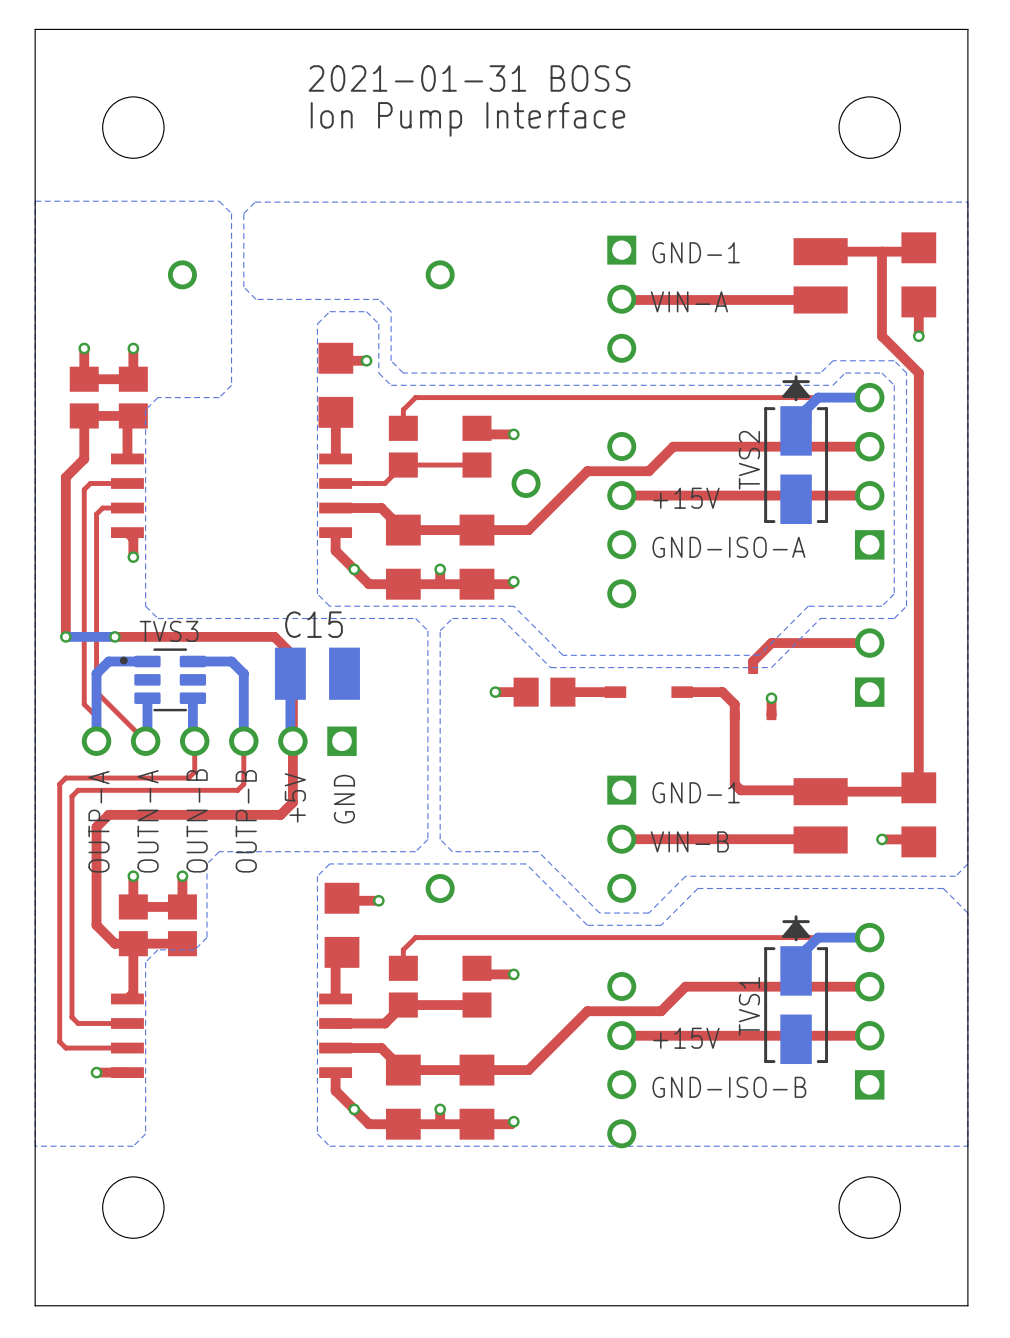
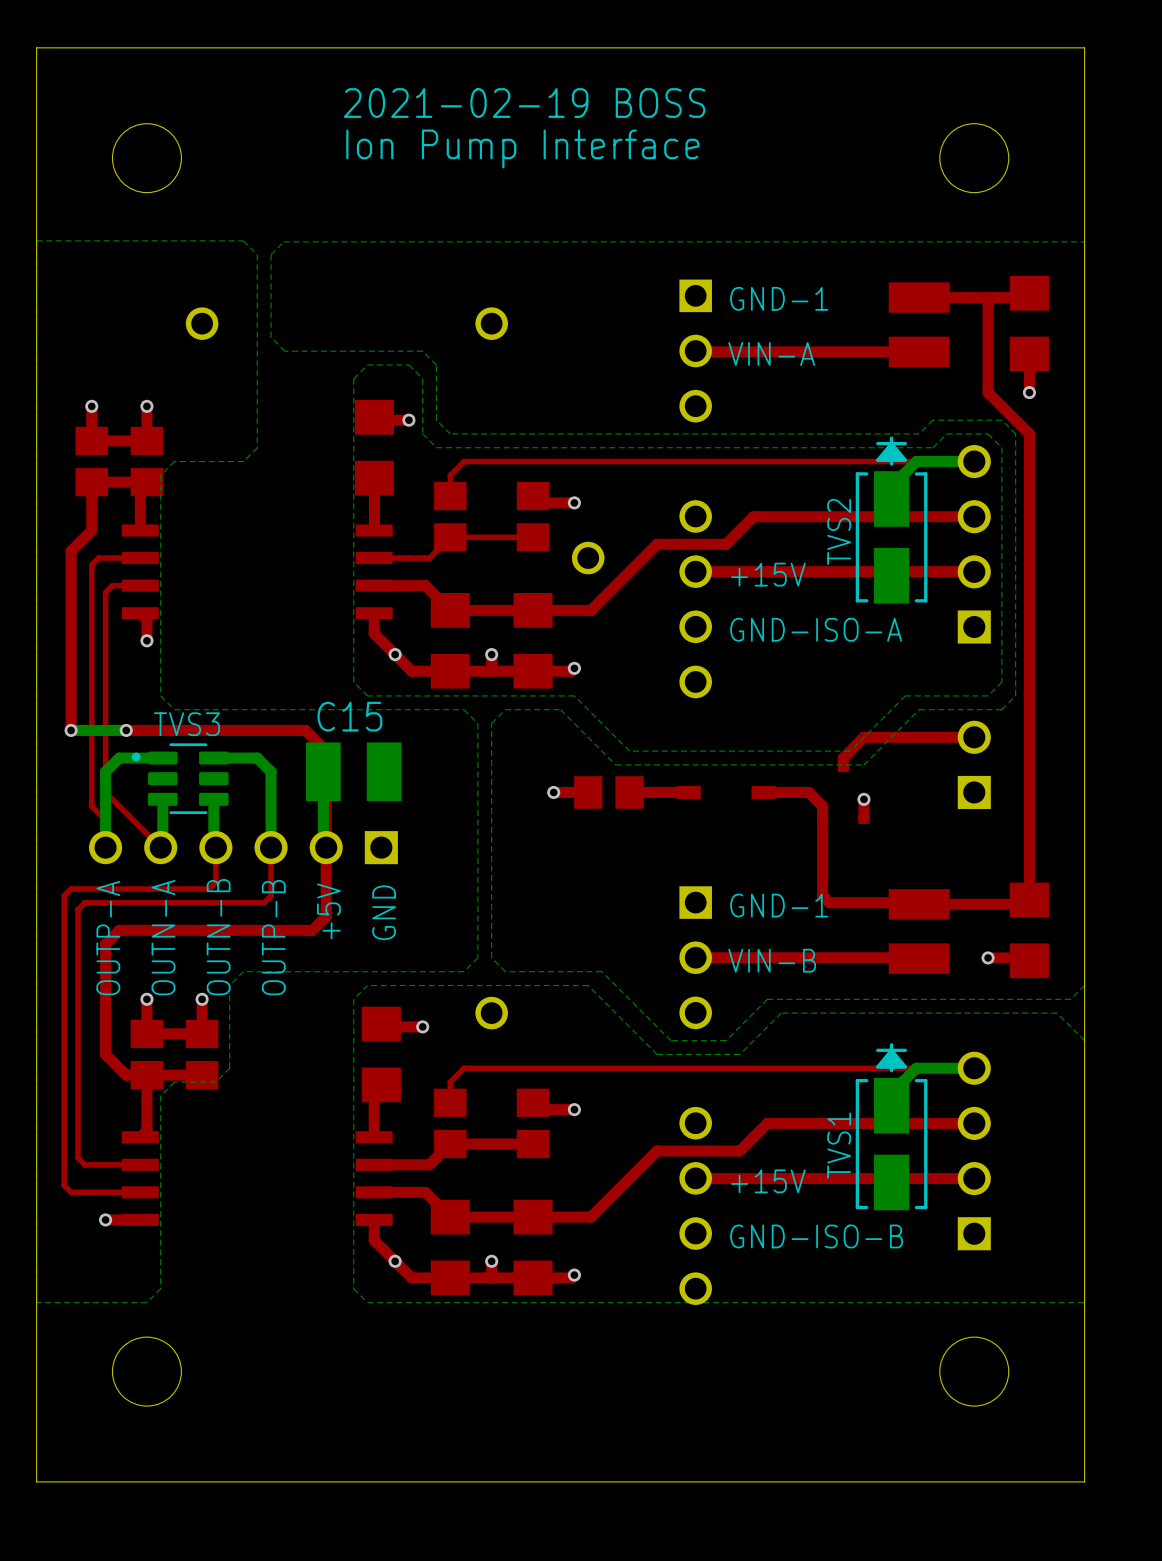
text: 2021-01-31 BOSS (469, 78) -> 2021-02-19 BOSS (524, 103)

